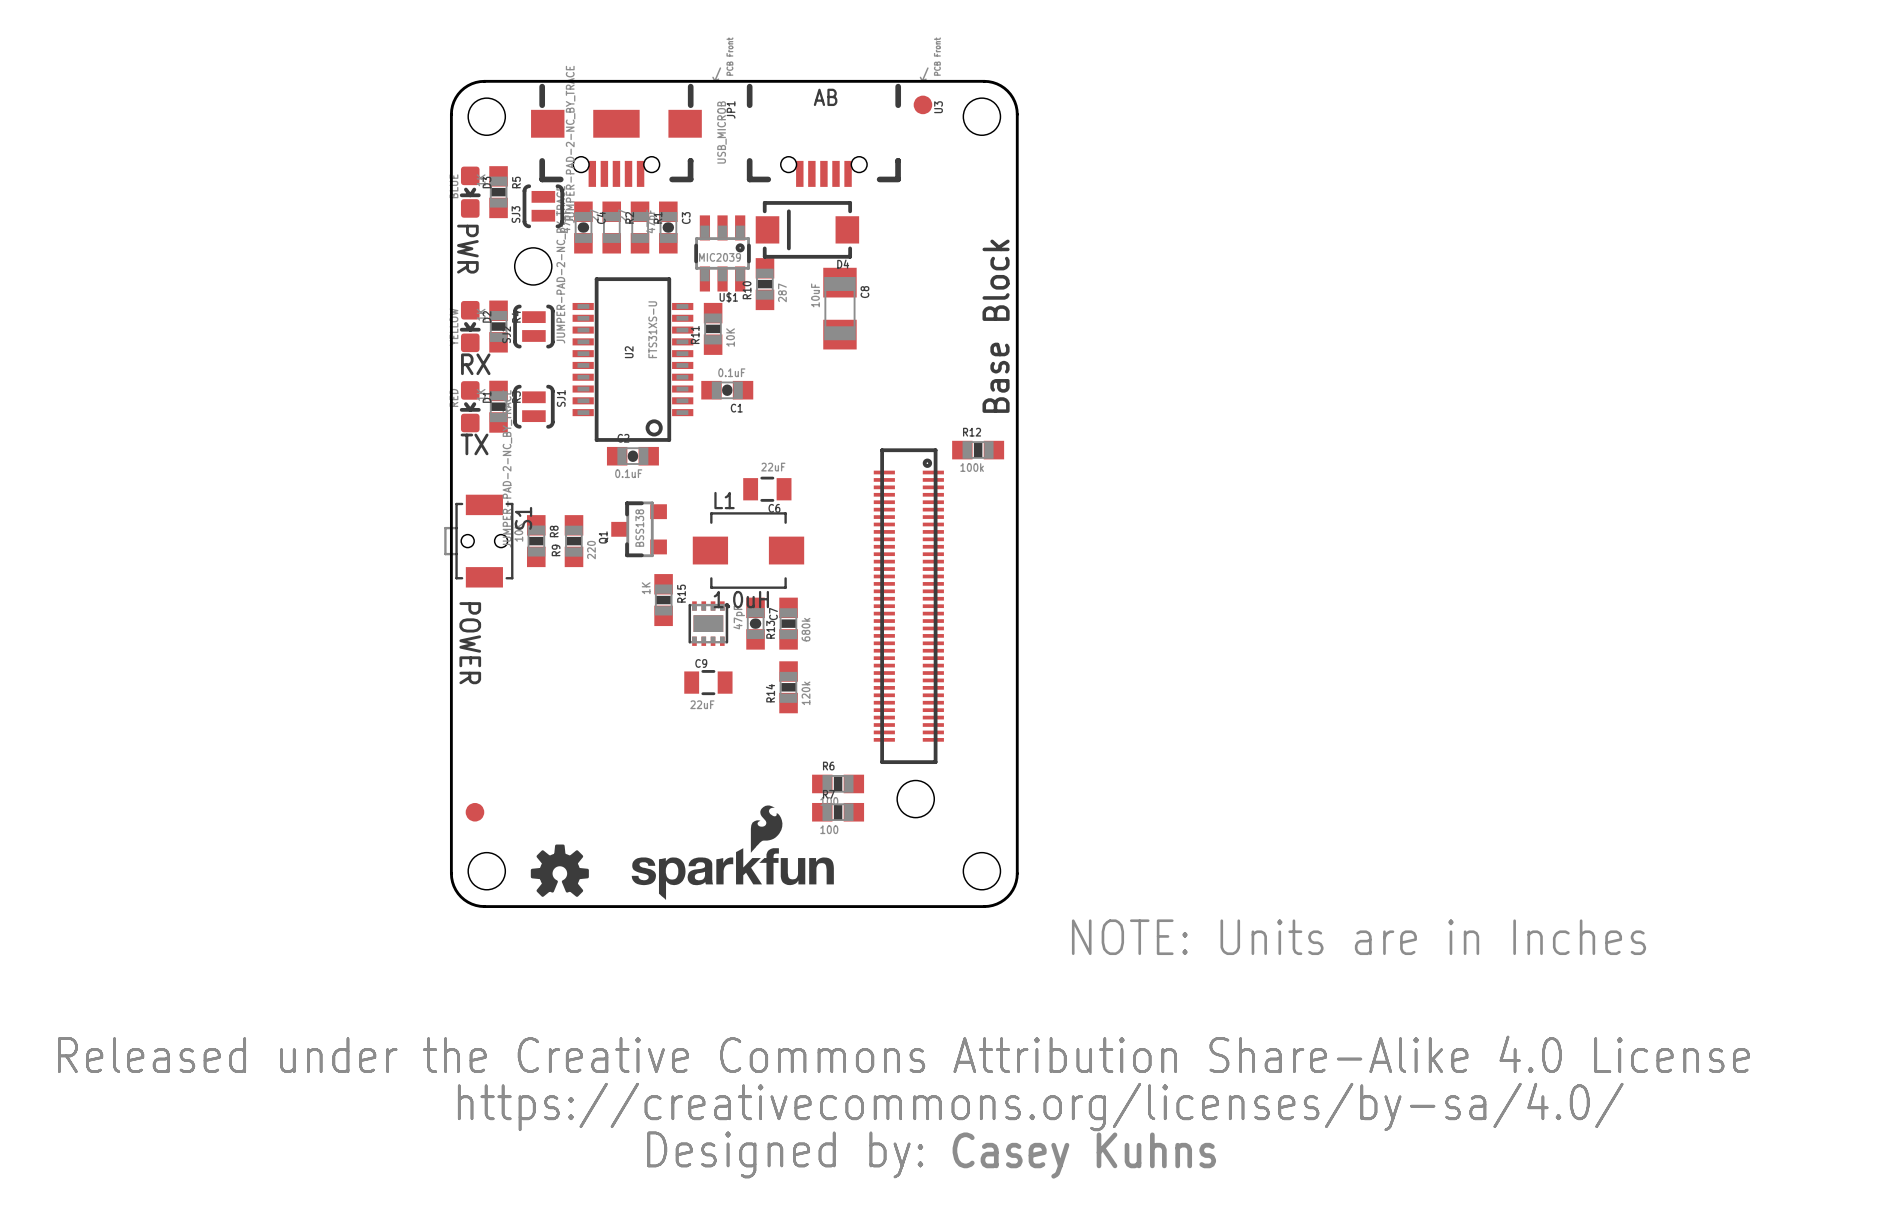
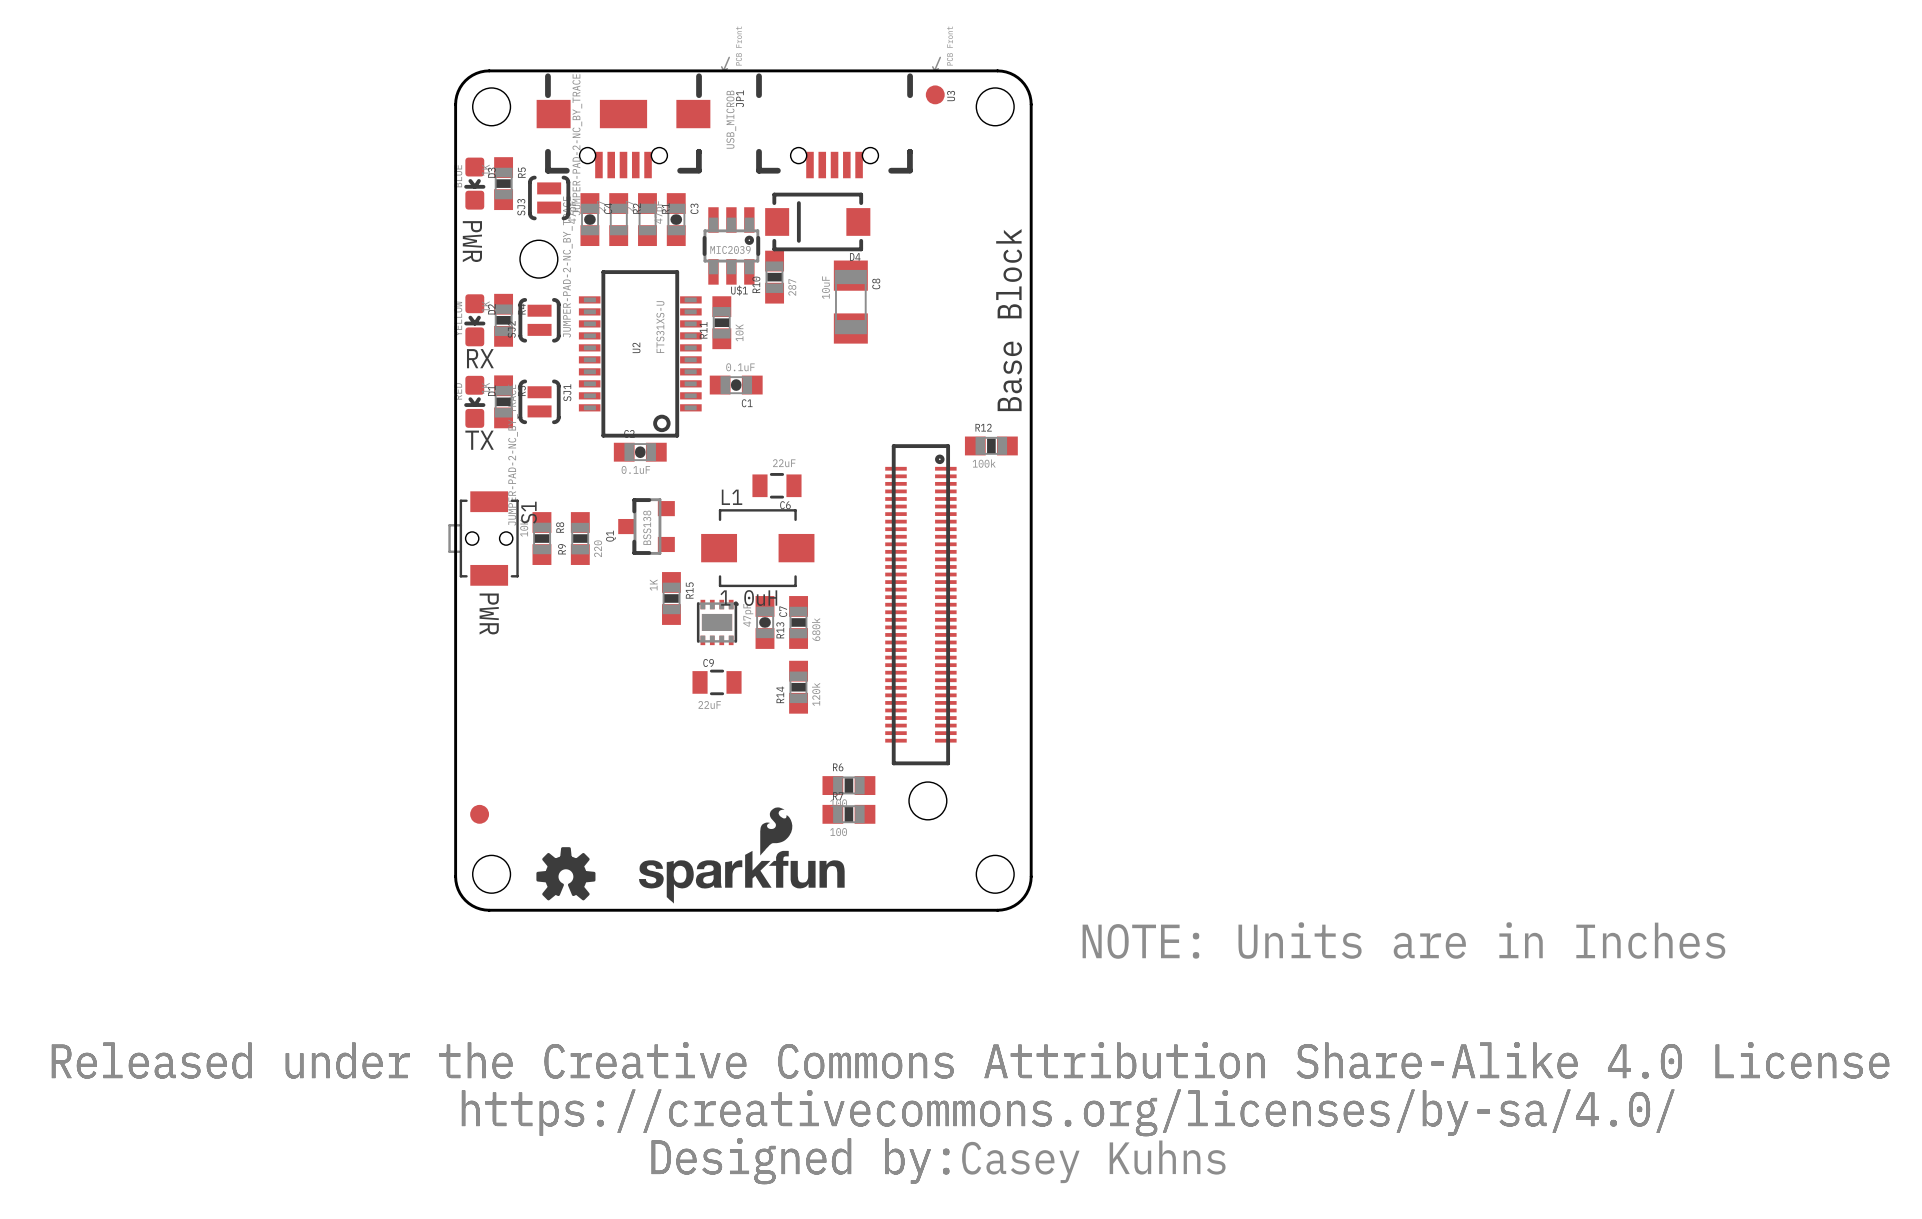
text: AB (825, 97) -> none
text: POWER (470, 643) -> PWR (489, 614)

